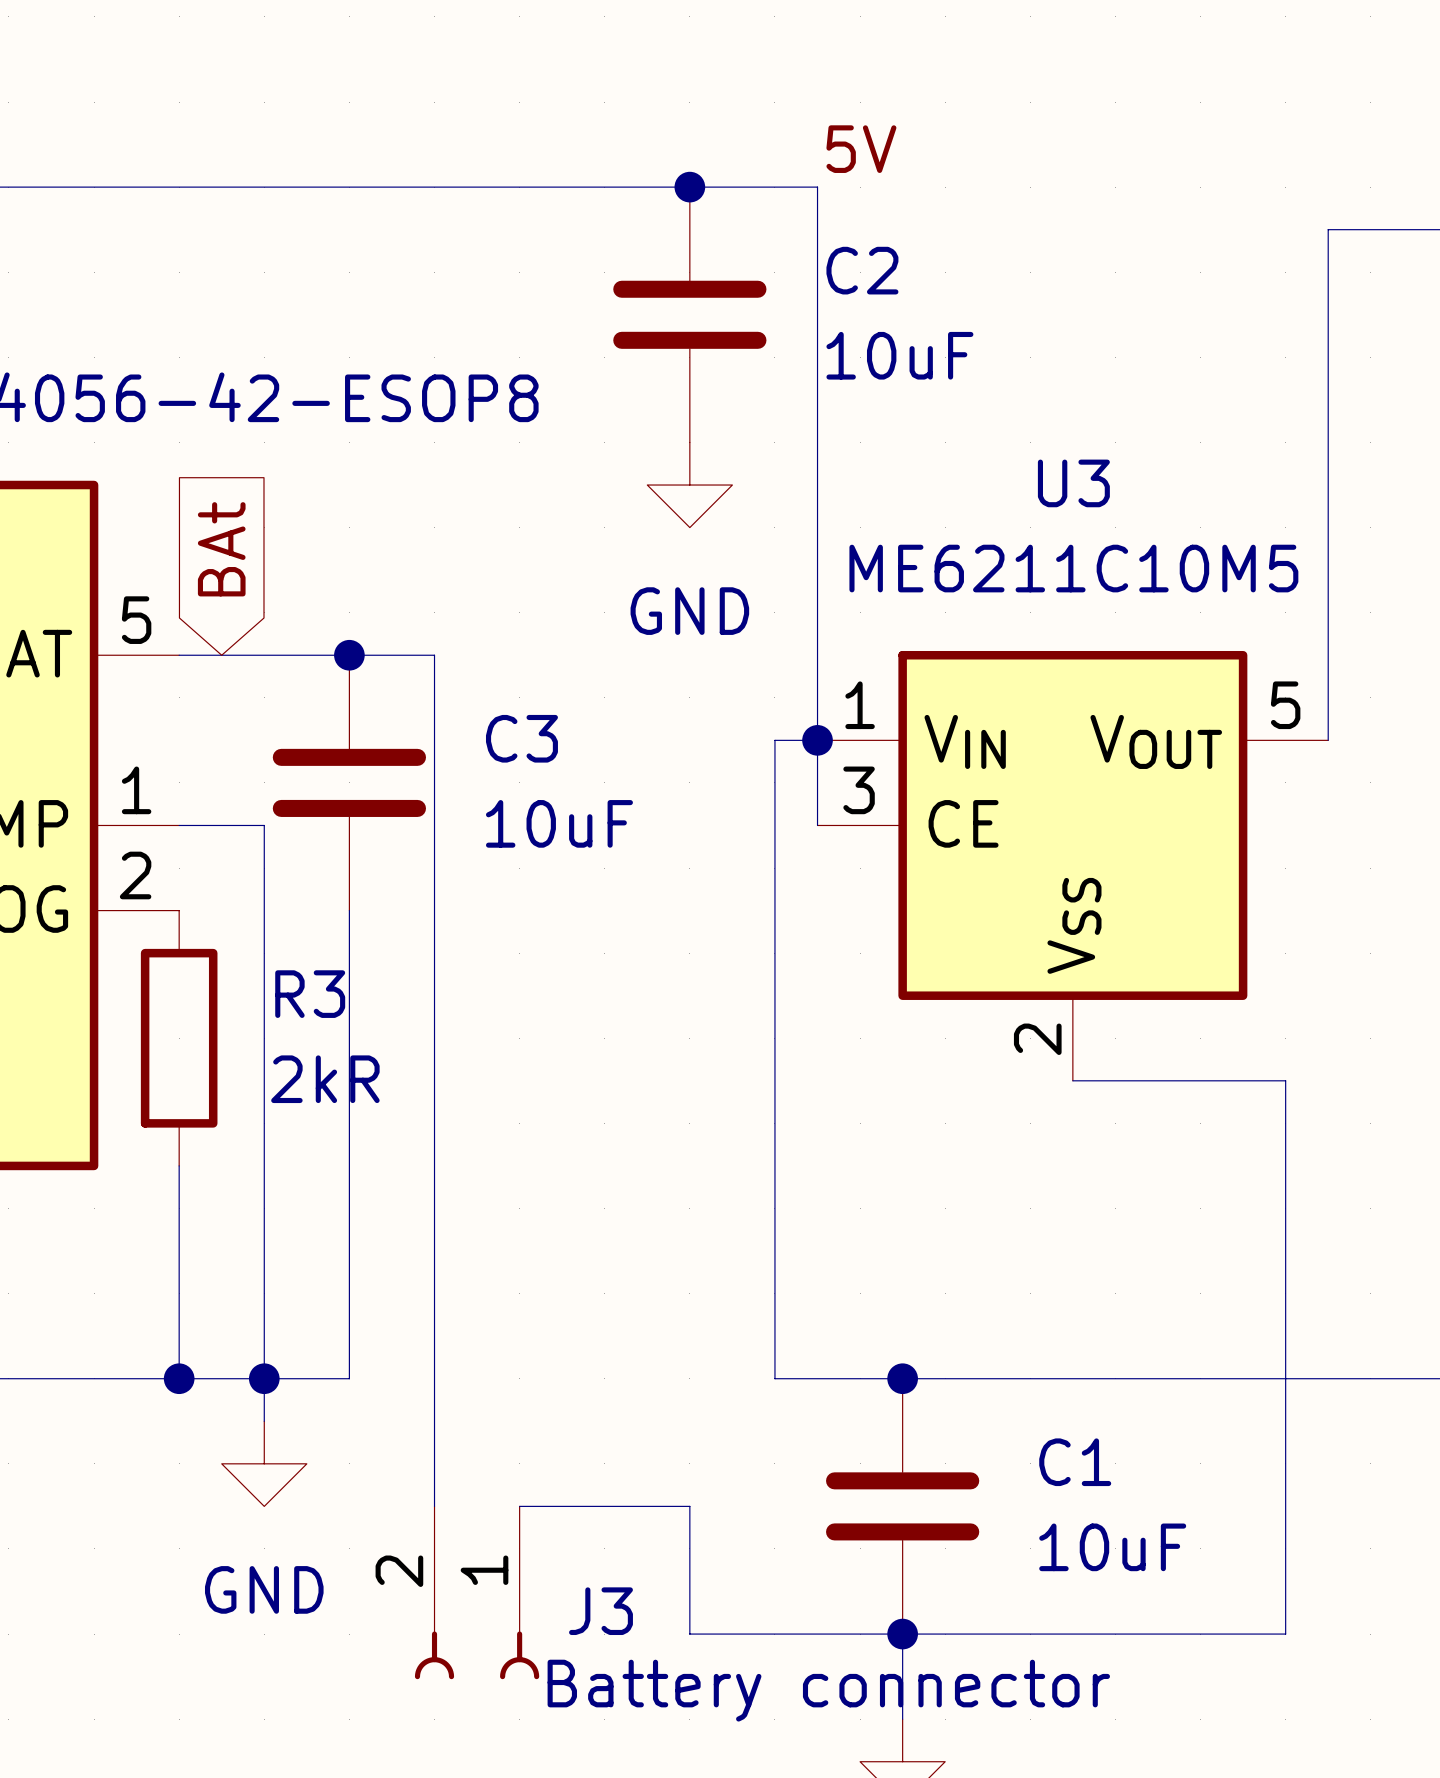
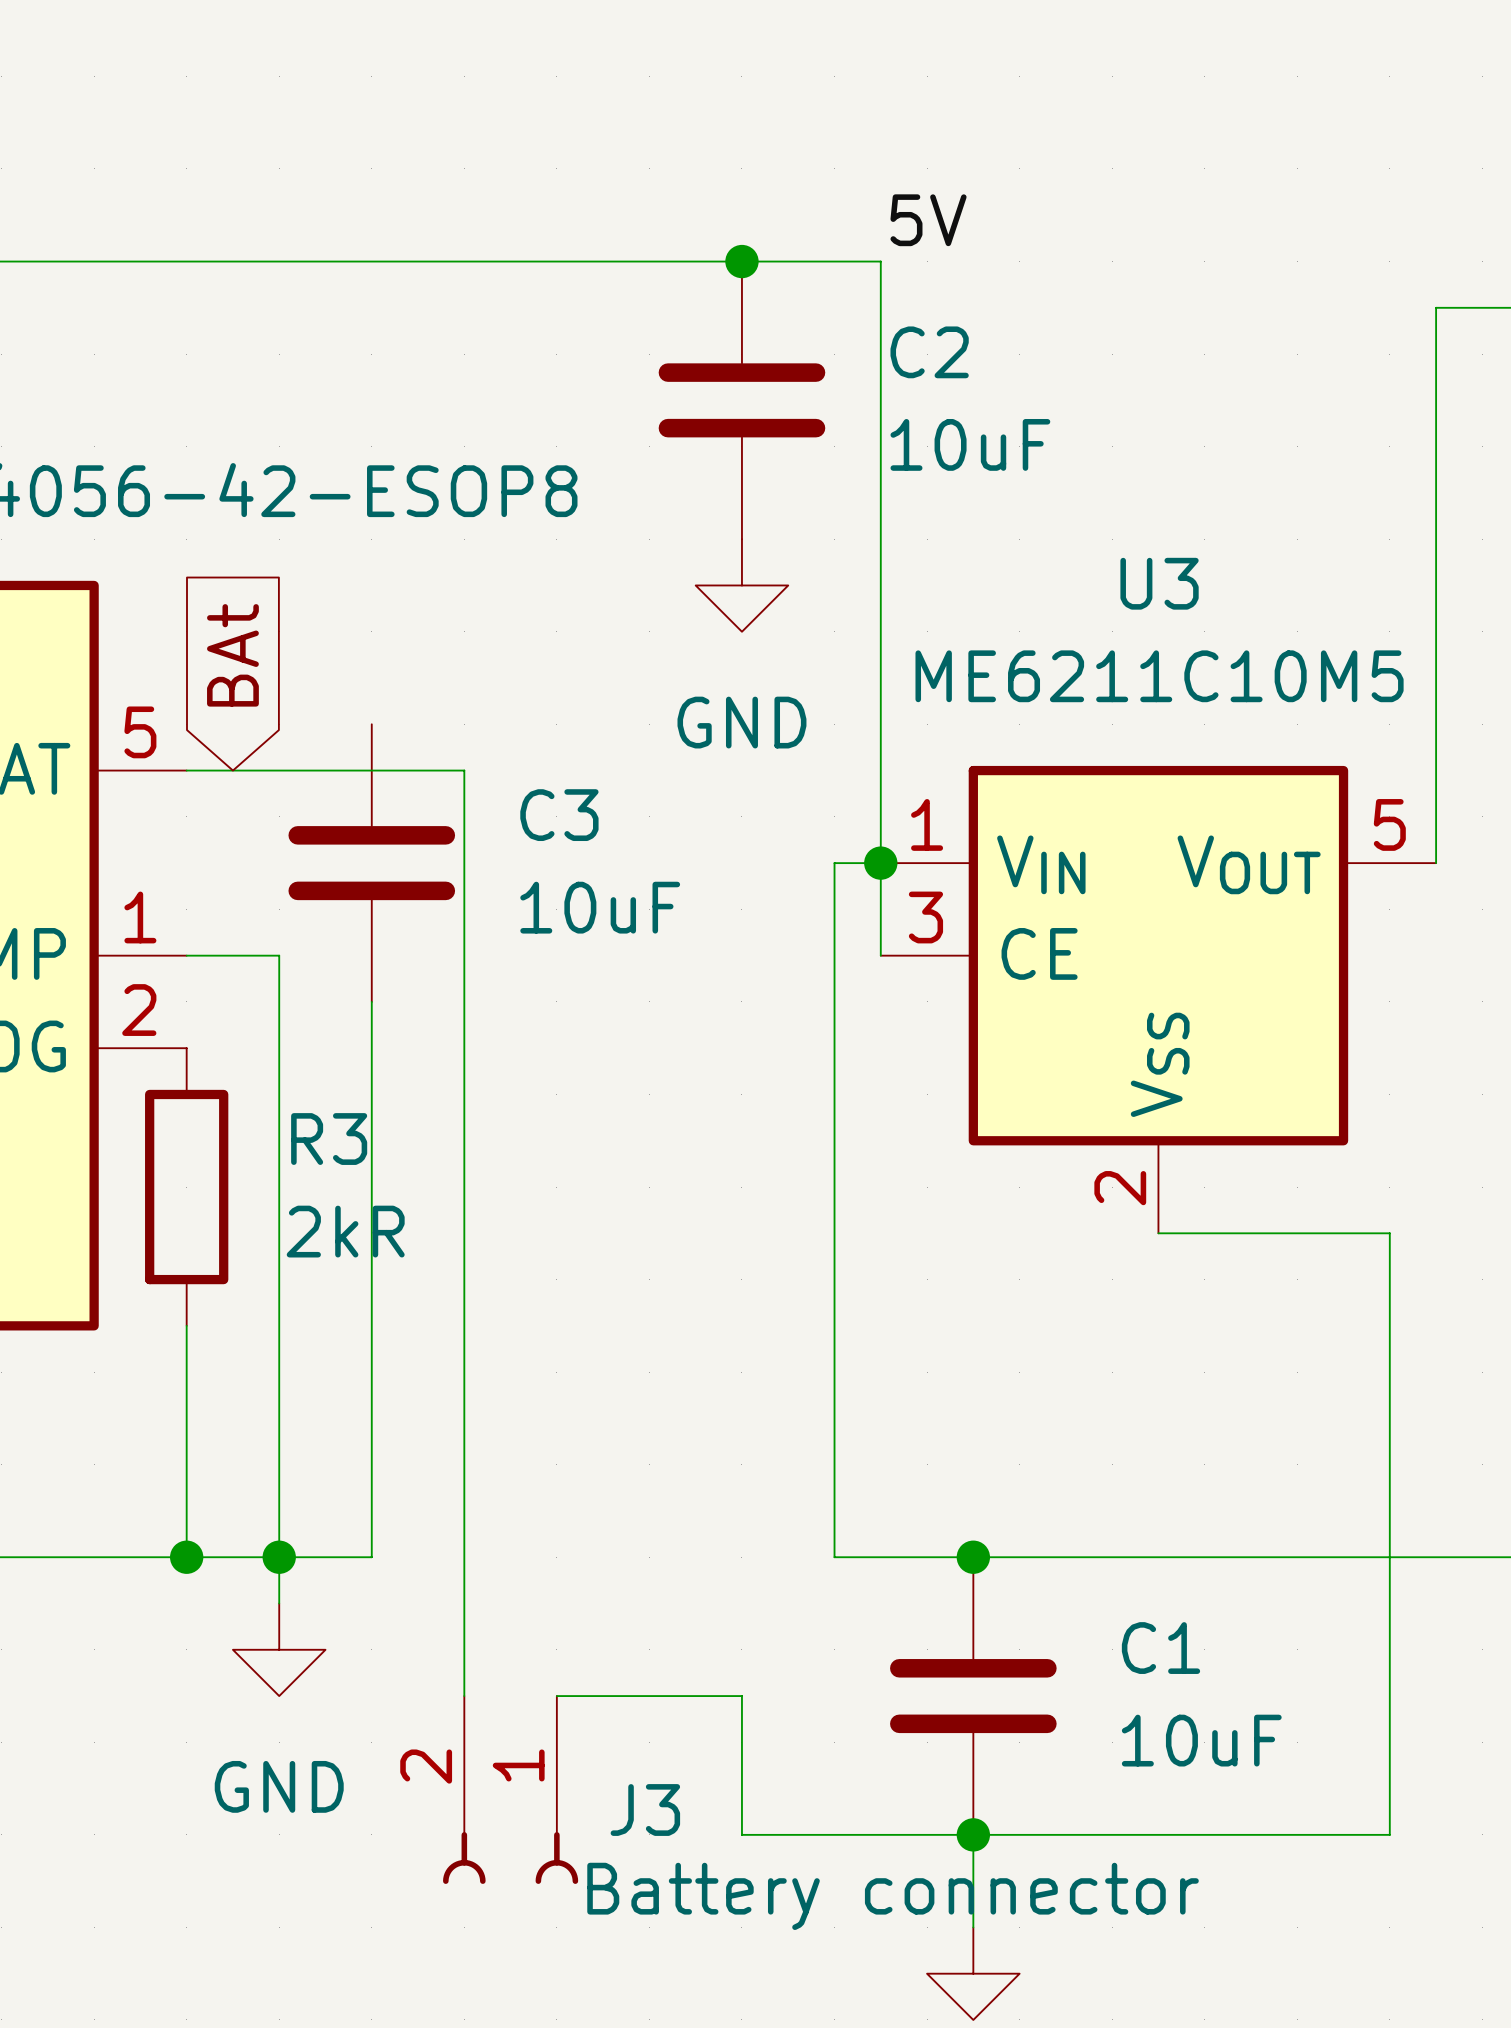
junction: (349, 655) -> none
C3 position: (349, 782) -> (371, 863)

